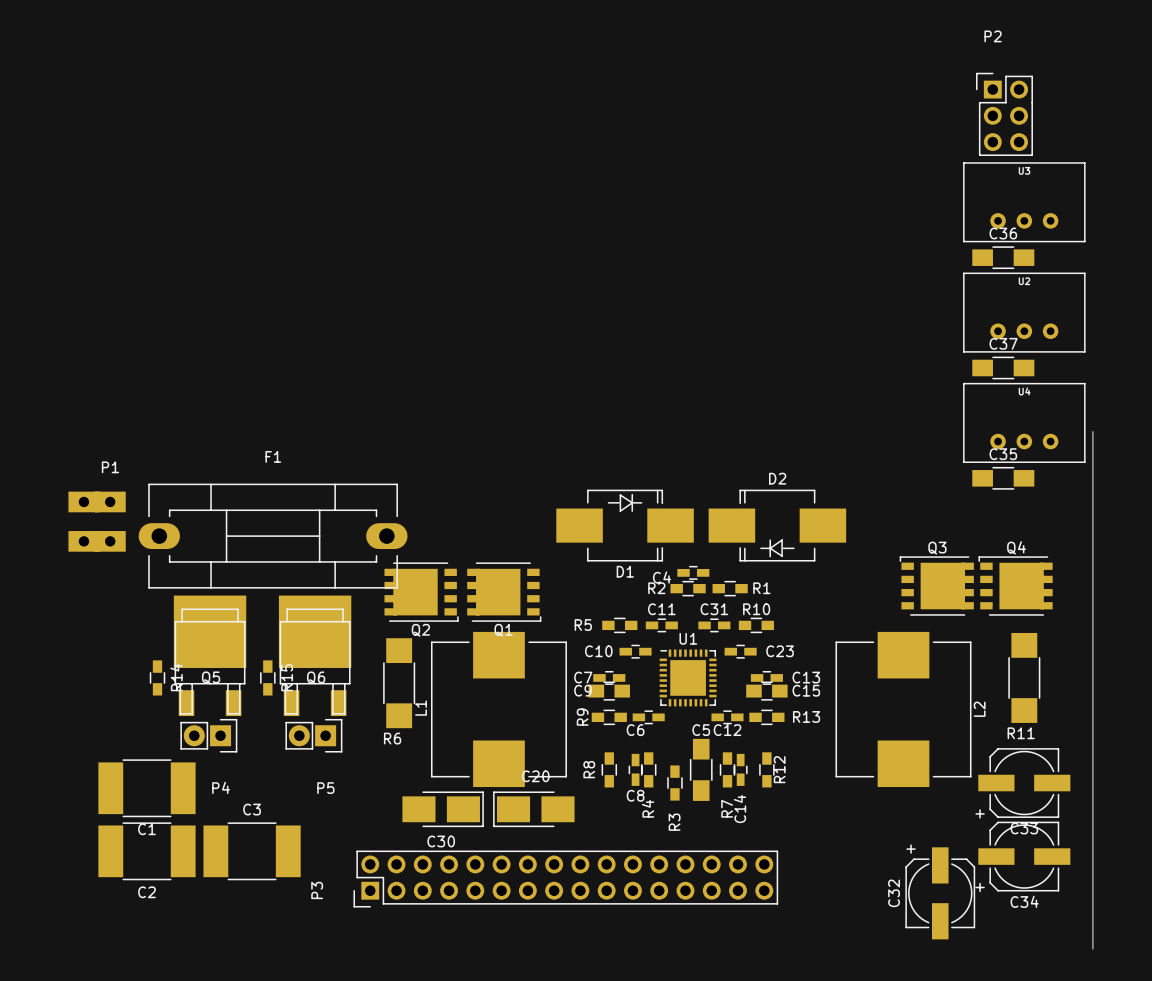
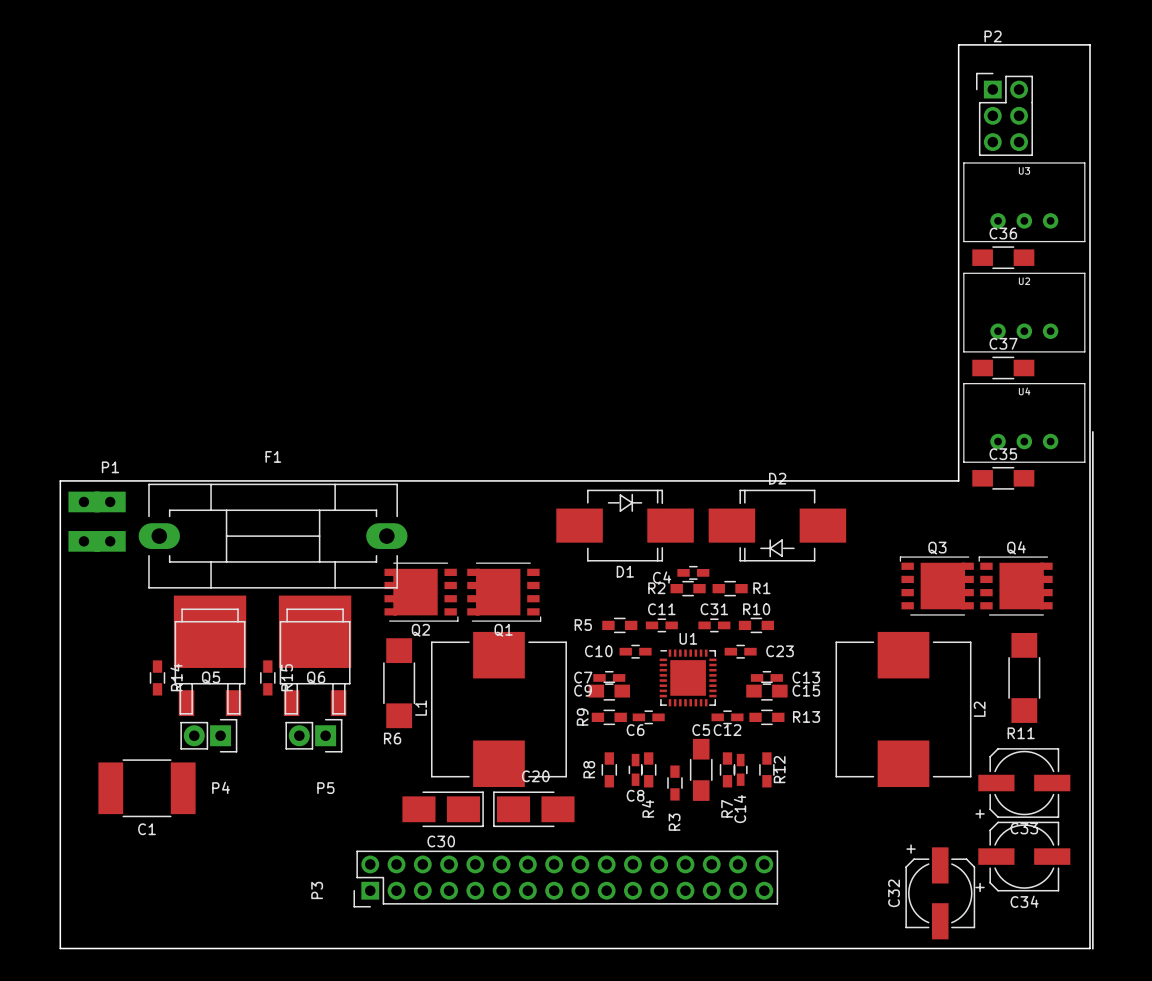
board edge: none -> (958, 44) (958, 480) (60, 480) (60, 948) (1090, 948) (1090, 44) (958, 44)
C2: (146, 851) -> none
C3: (252, 851) -> none

